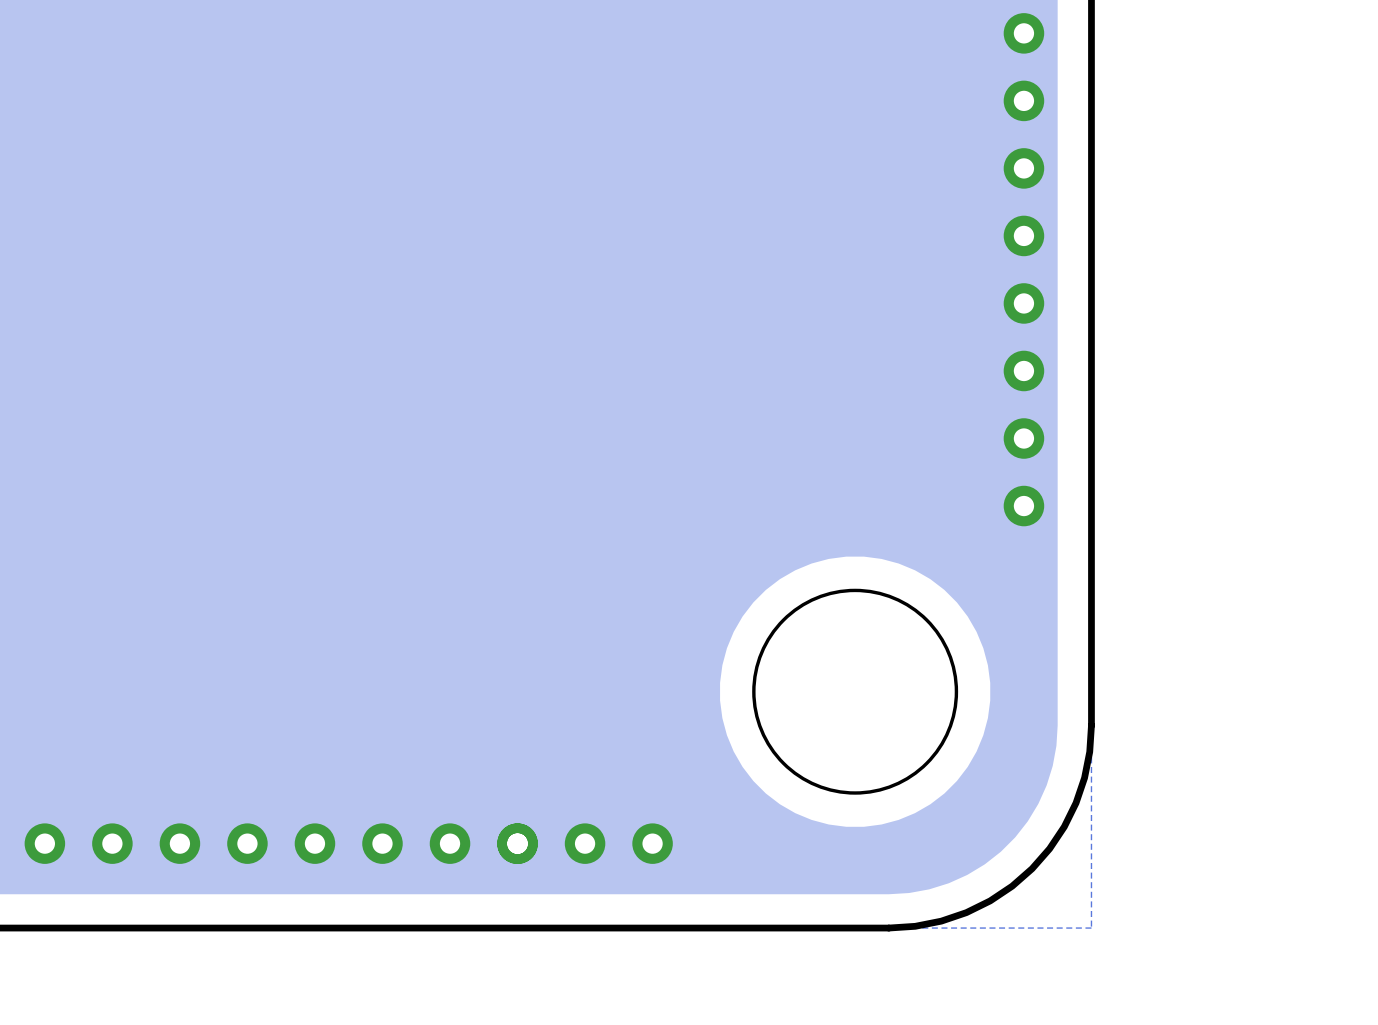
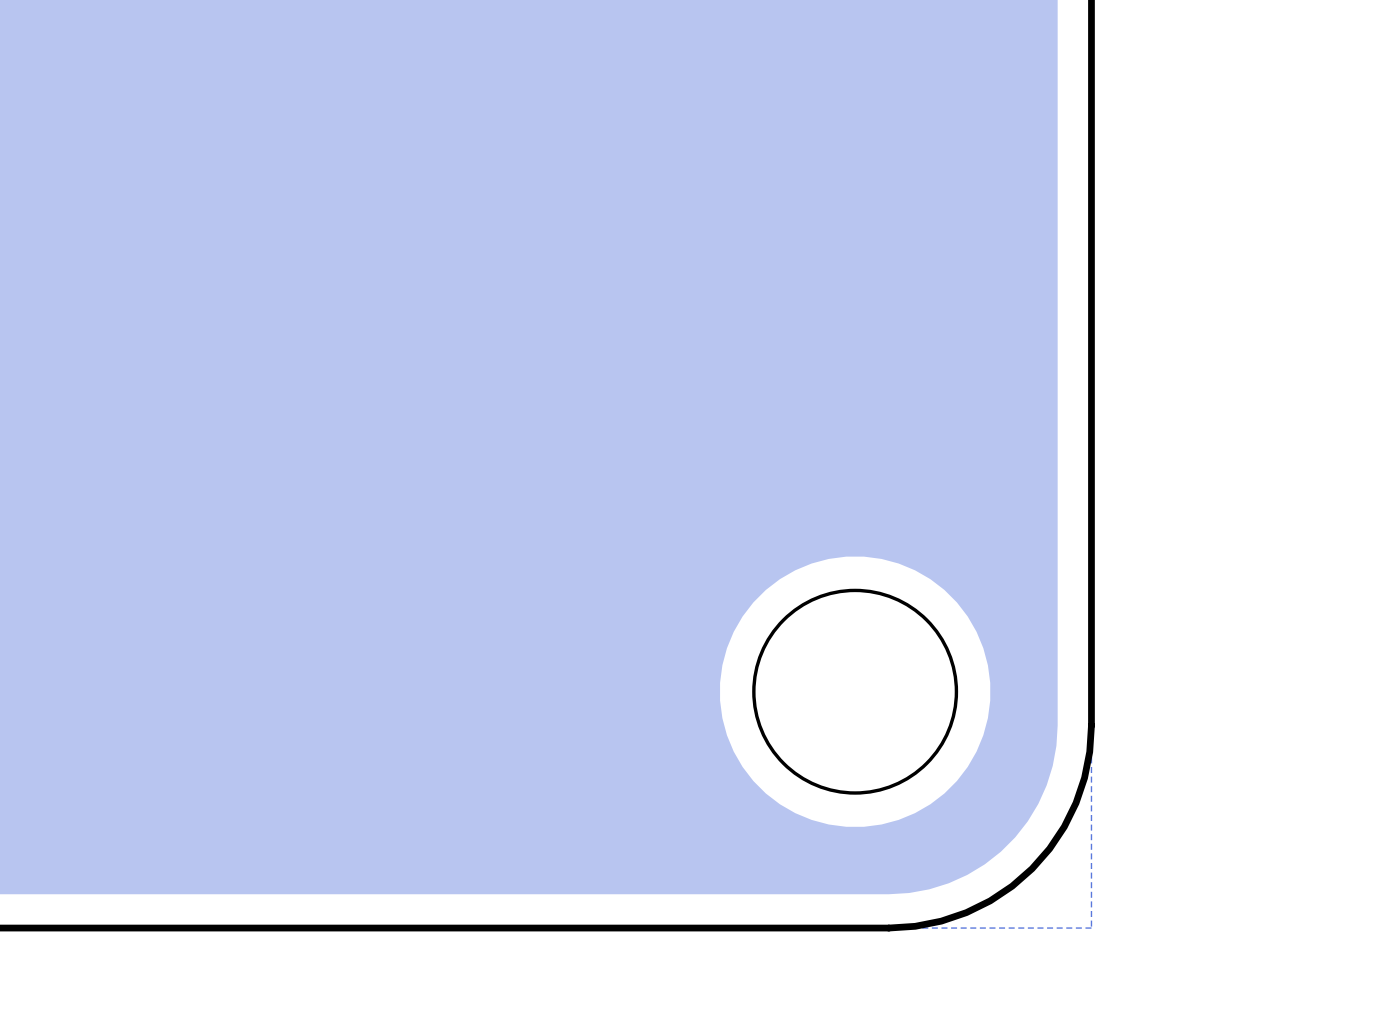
via: (1023, 33) -> none
via: (1023, 100) -> none
via: (1023, 168) -> none
via: (1023, 235) -> none
via: (1023, 303) -> none
via: (1023, 370) -> none
via: (1023, 438) -> none
via: (1023, 506) -> none
via: (44, 843) -> none
via: (112, 843) -> none
via: (179, 843) -> none
via: (247, 843) -> none
via: (314, 843) -> none
via: (382, 843) -> none
via: (450, 843) -> none
via: (517, 843) -> none
via: (585, 843) -> none
via: (652, 843) -> none

